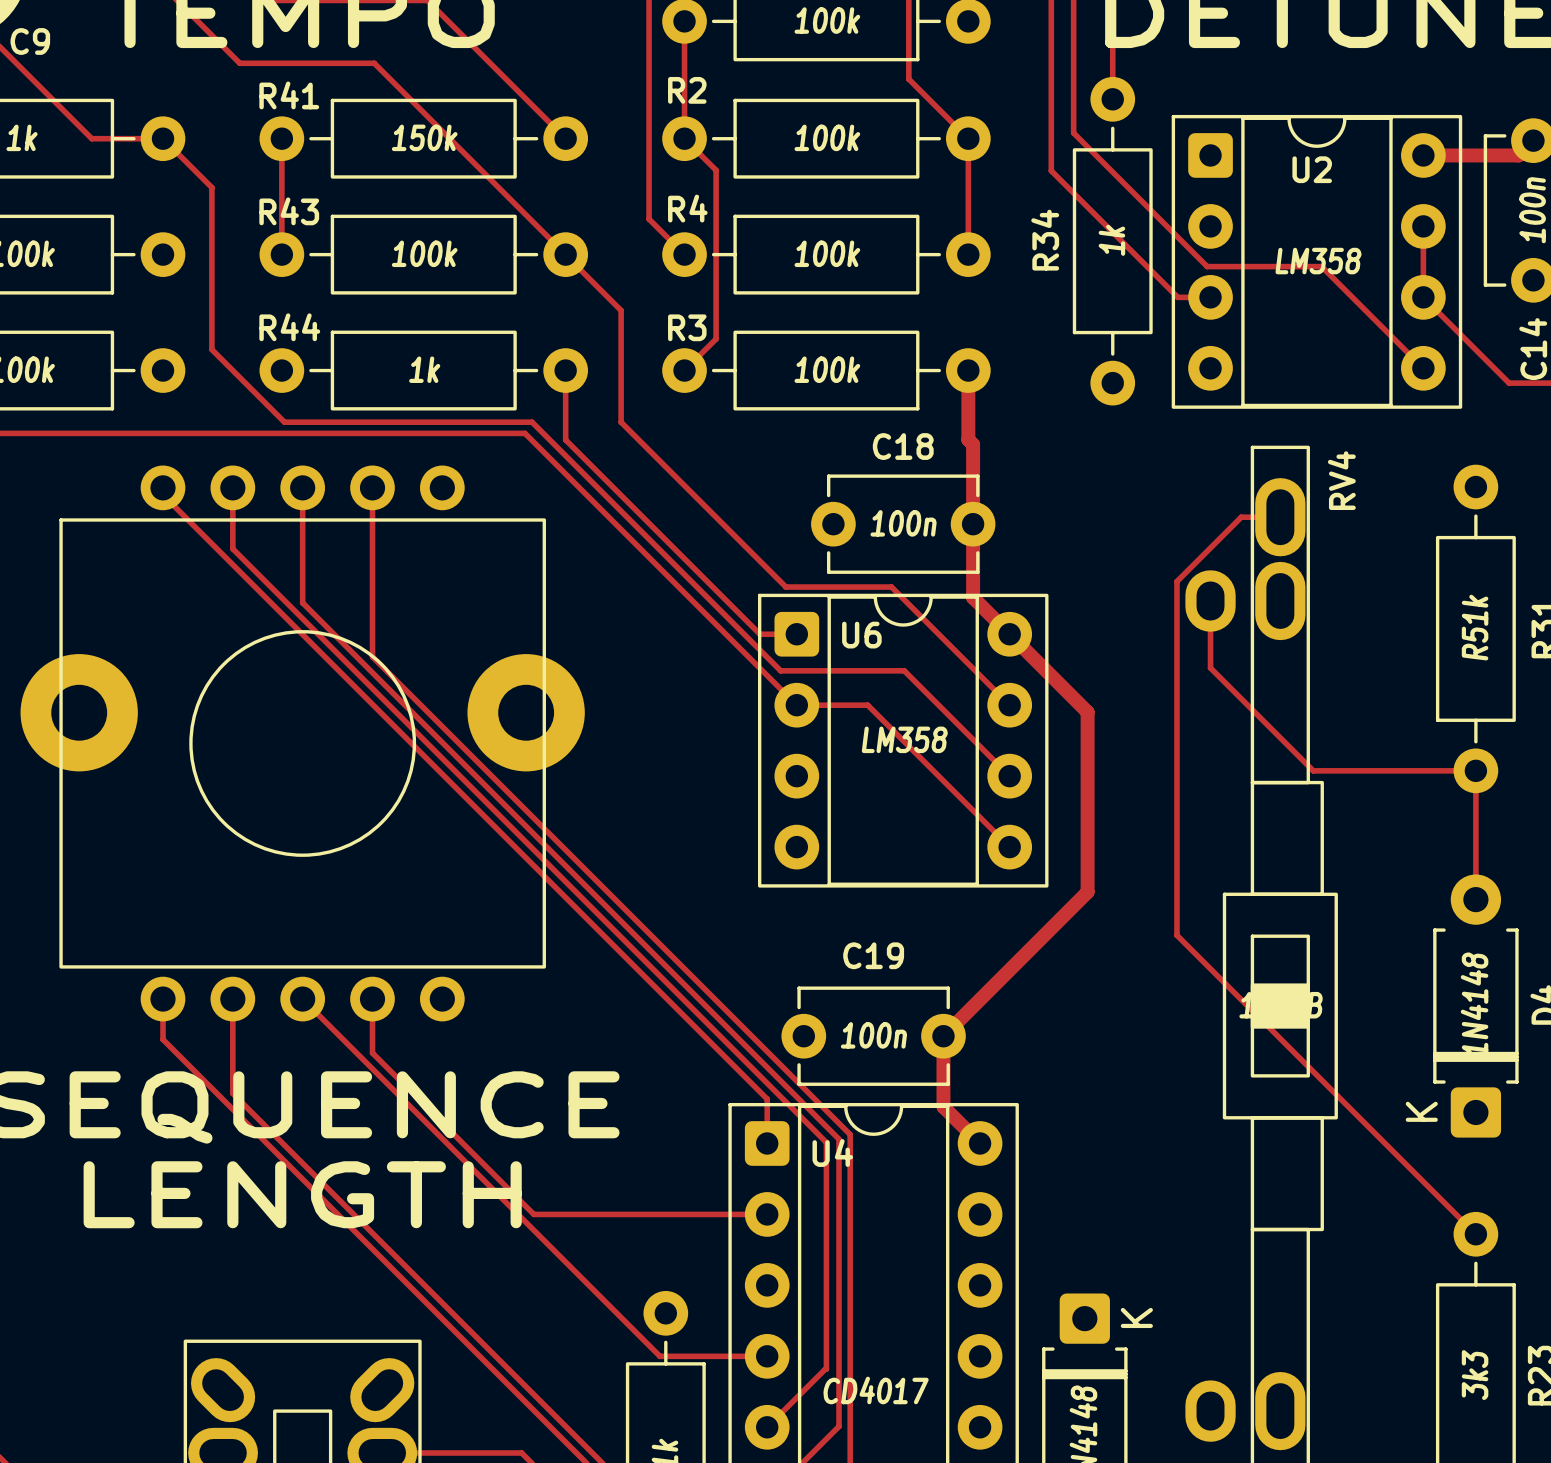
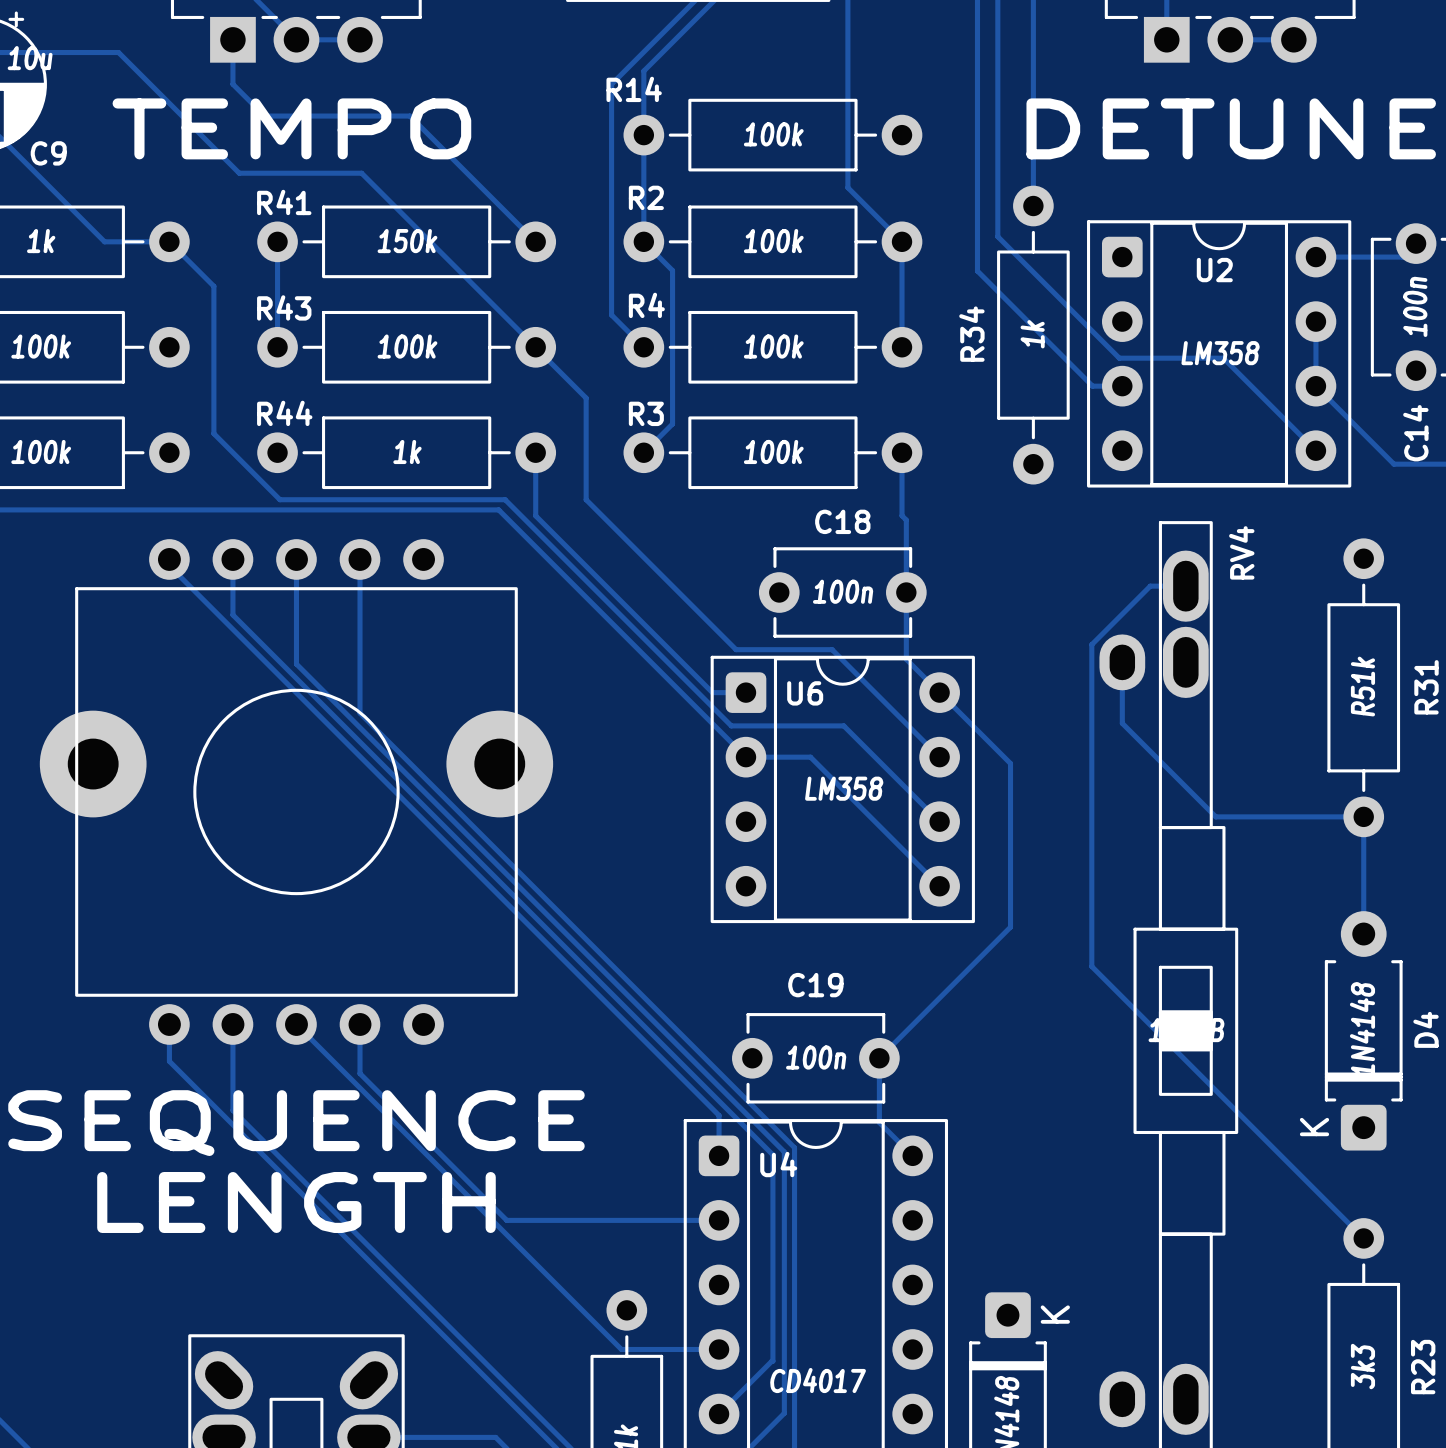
track width: thick (1533, 140) (1518, 155) (1423, 155) -> thin (1416, 243) (1402, 257) (1315, 257)
track width: thick (968, 370) (968, 439) (973, 444) (973, 597) (1087, 712) (1087, 892) (943, 1036) (943, 1106) (980, 1143) -> thin (902, 452) (902, 515) (906, 520) (906, 659) (1010, 763) (1010, 927) (879, 1058) (879, 1122) (912, 1155)

